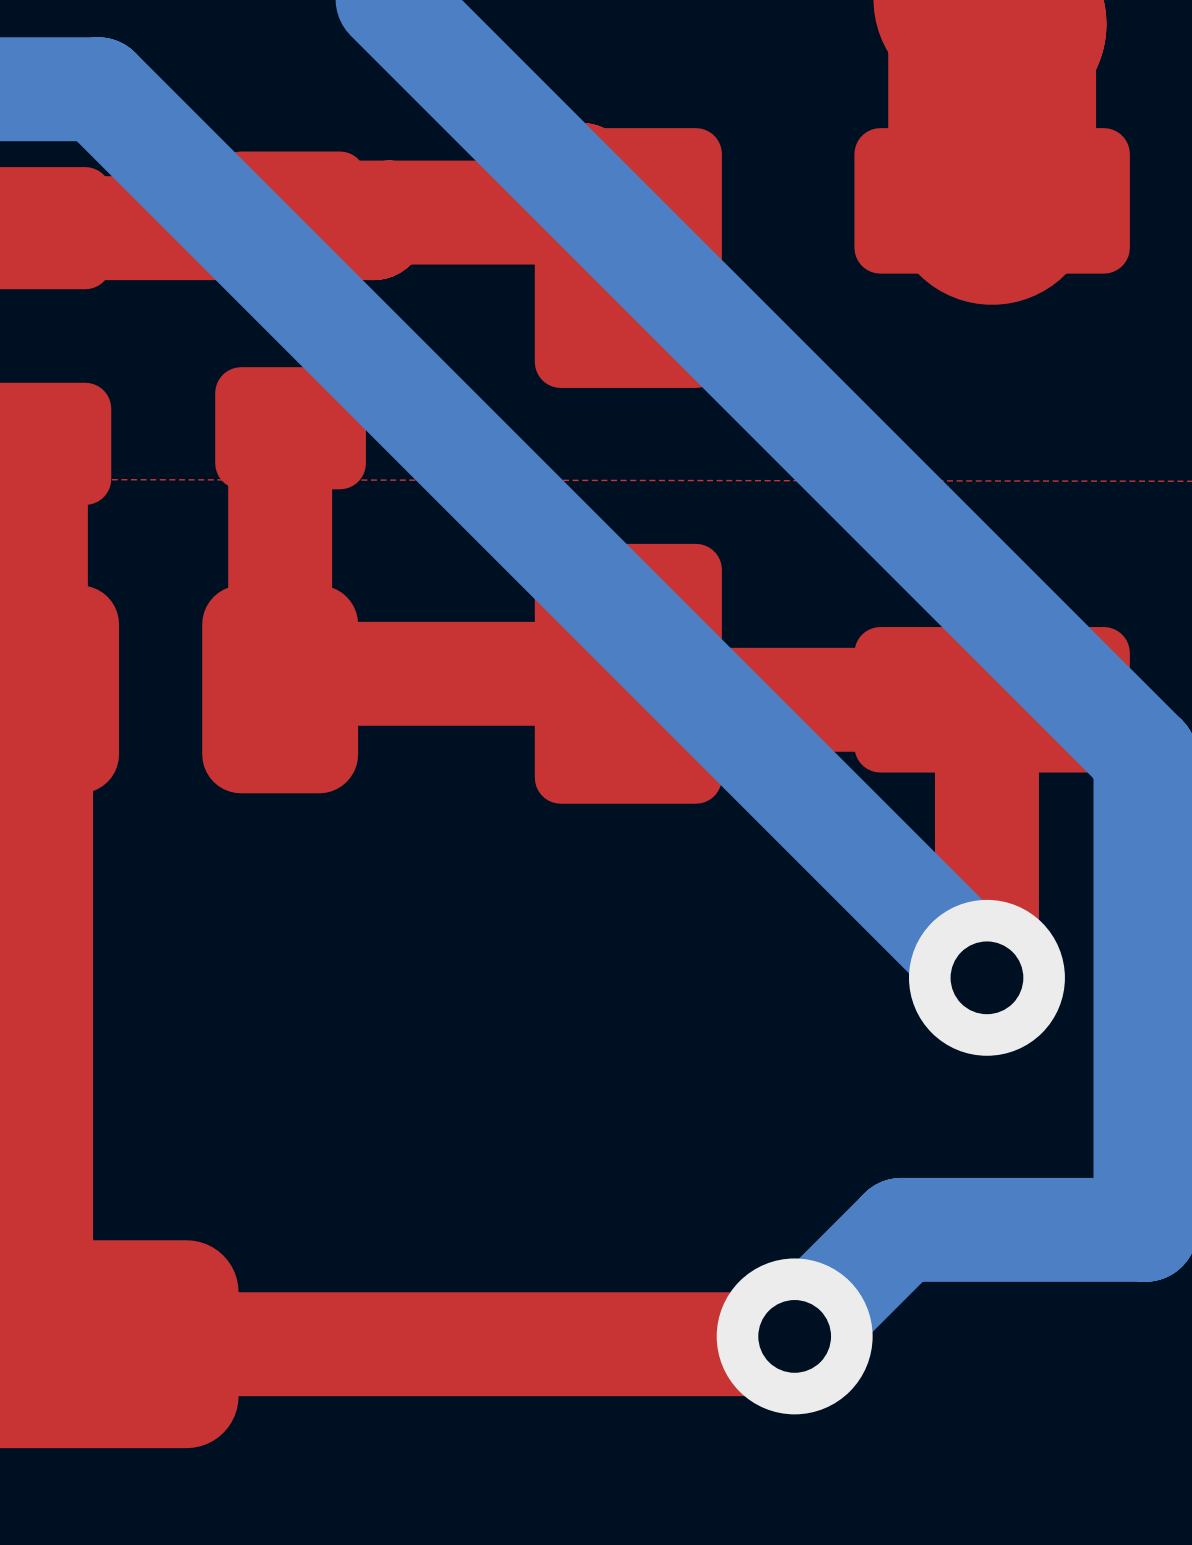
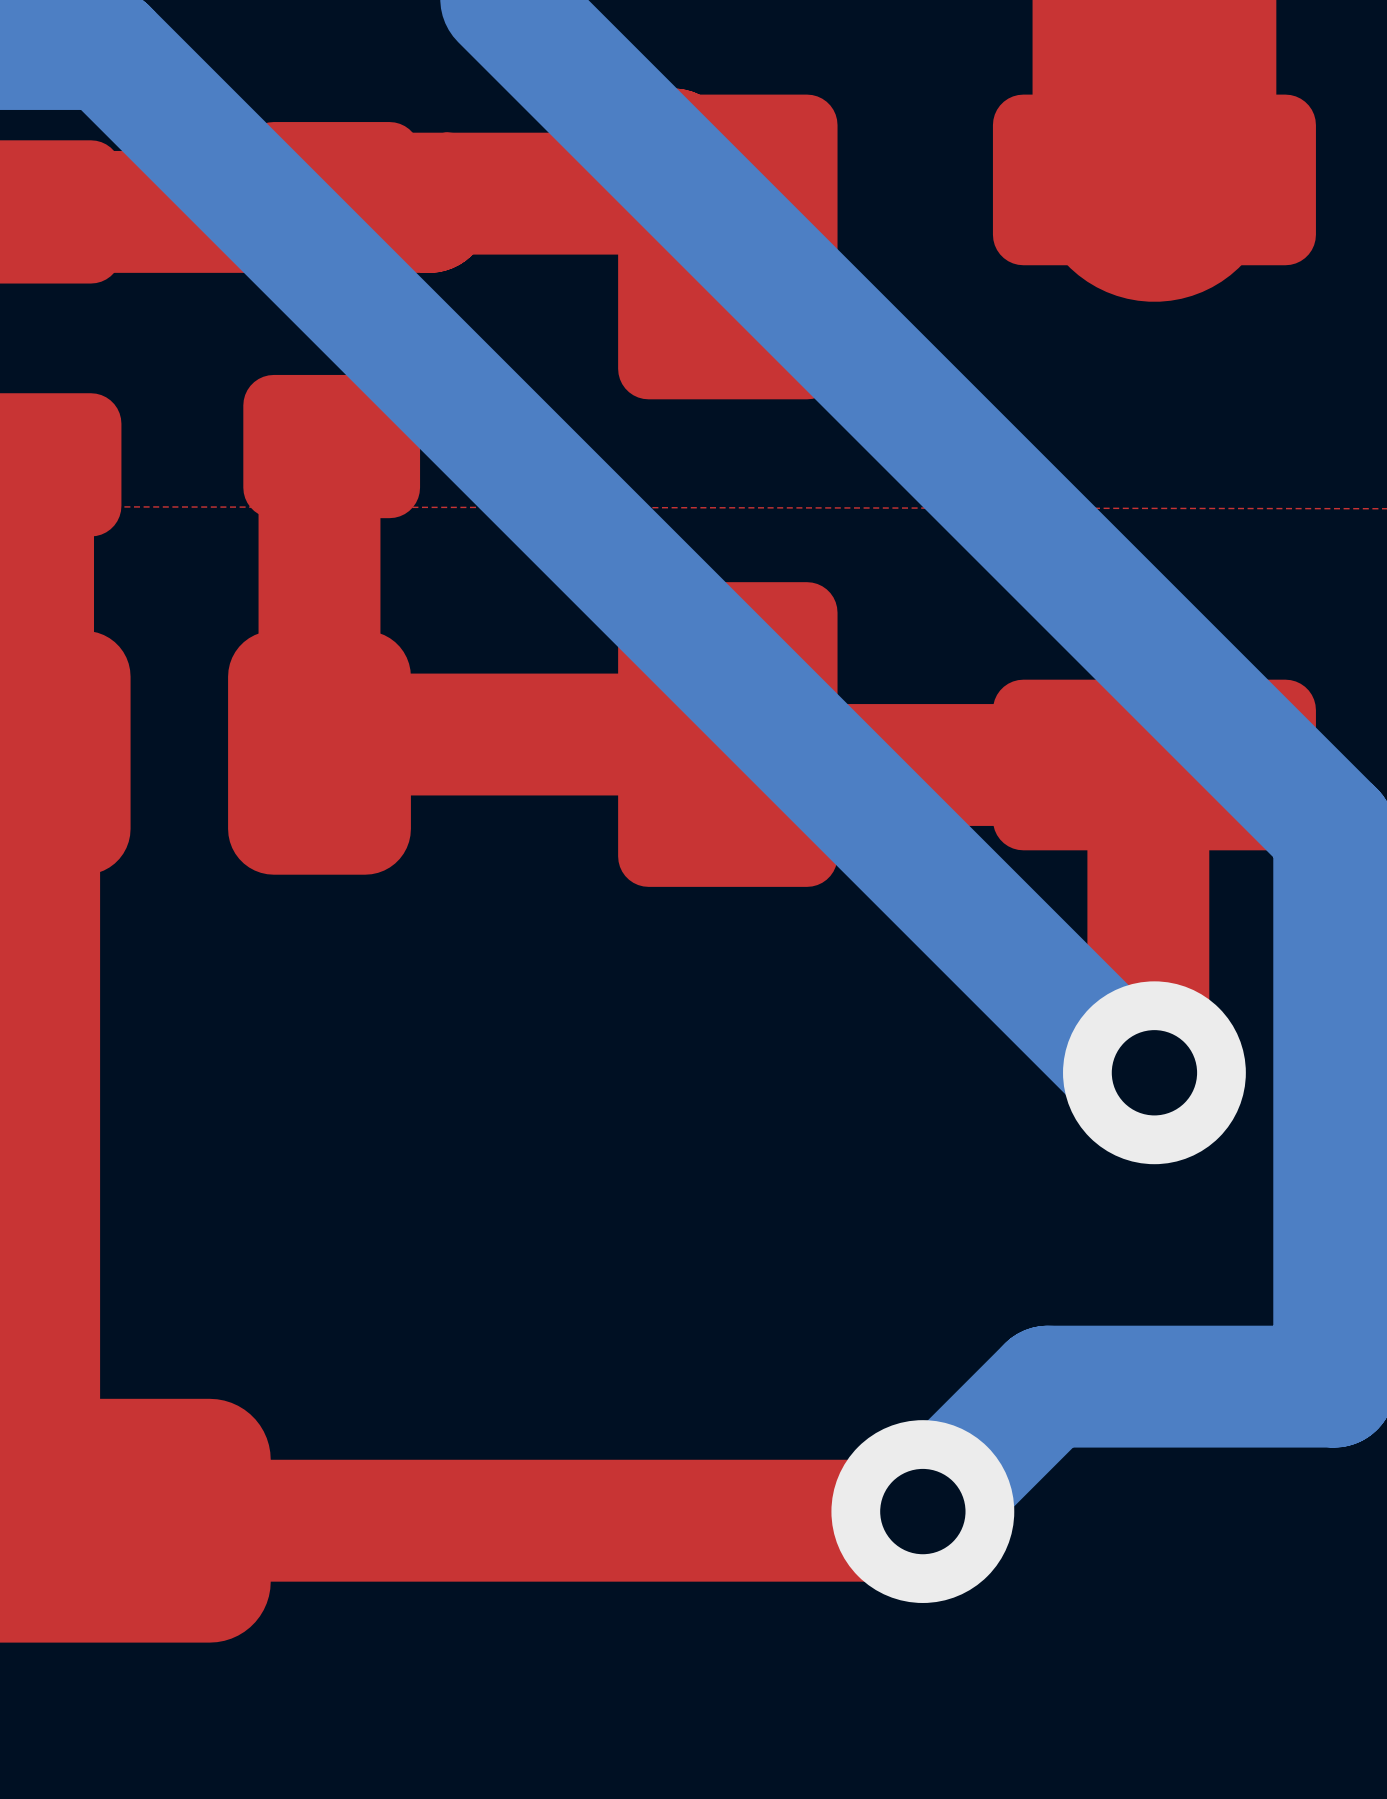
via position: (986, 977) -> (1154, 1072)

